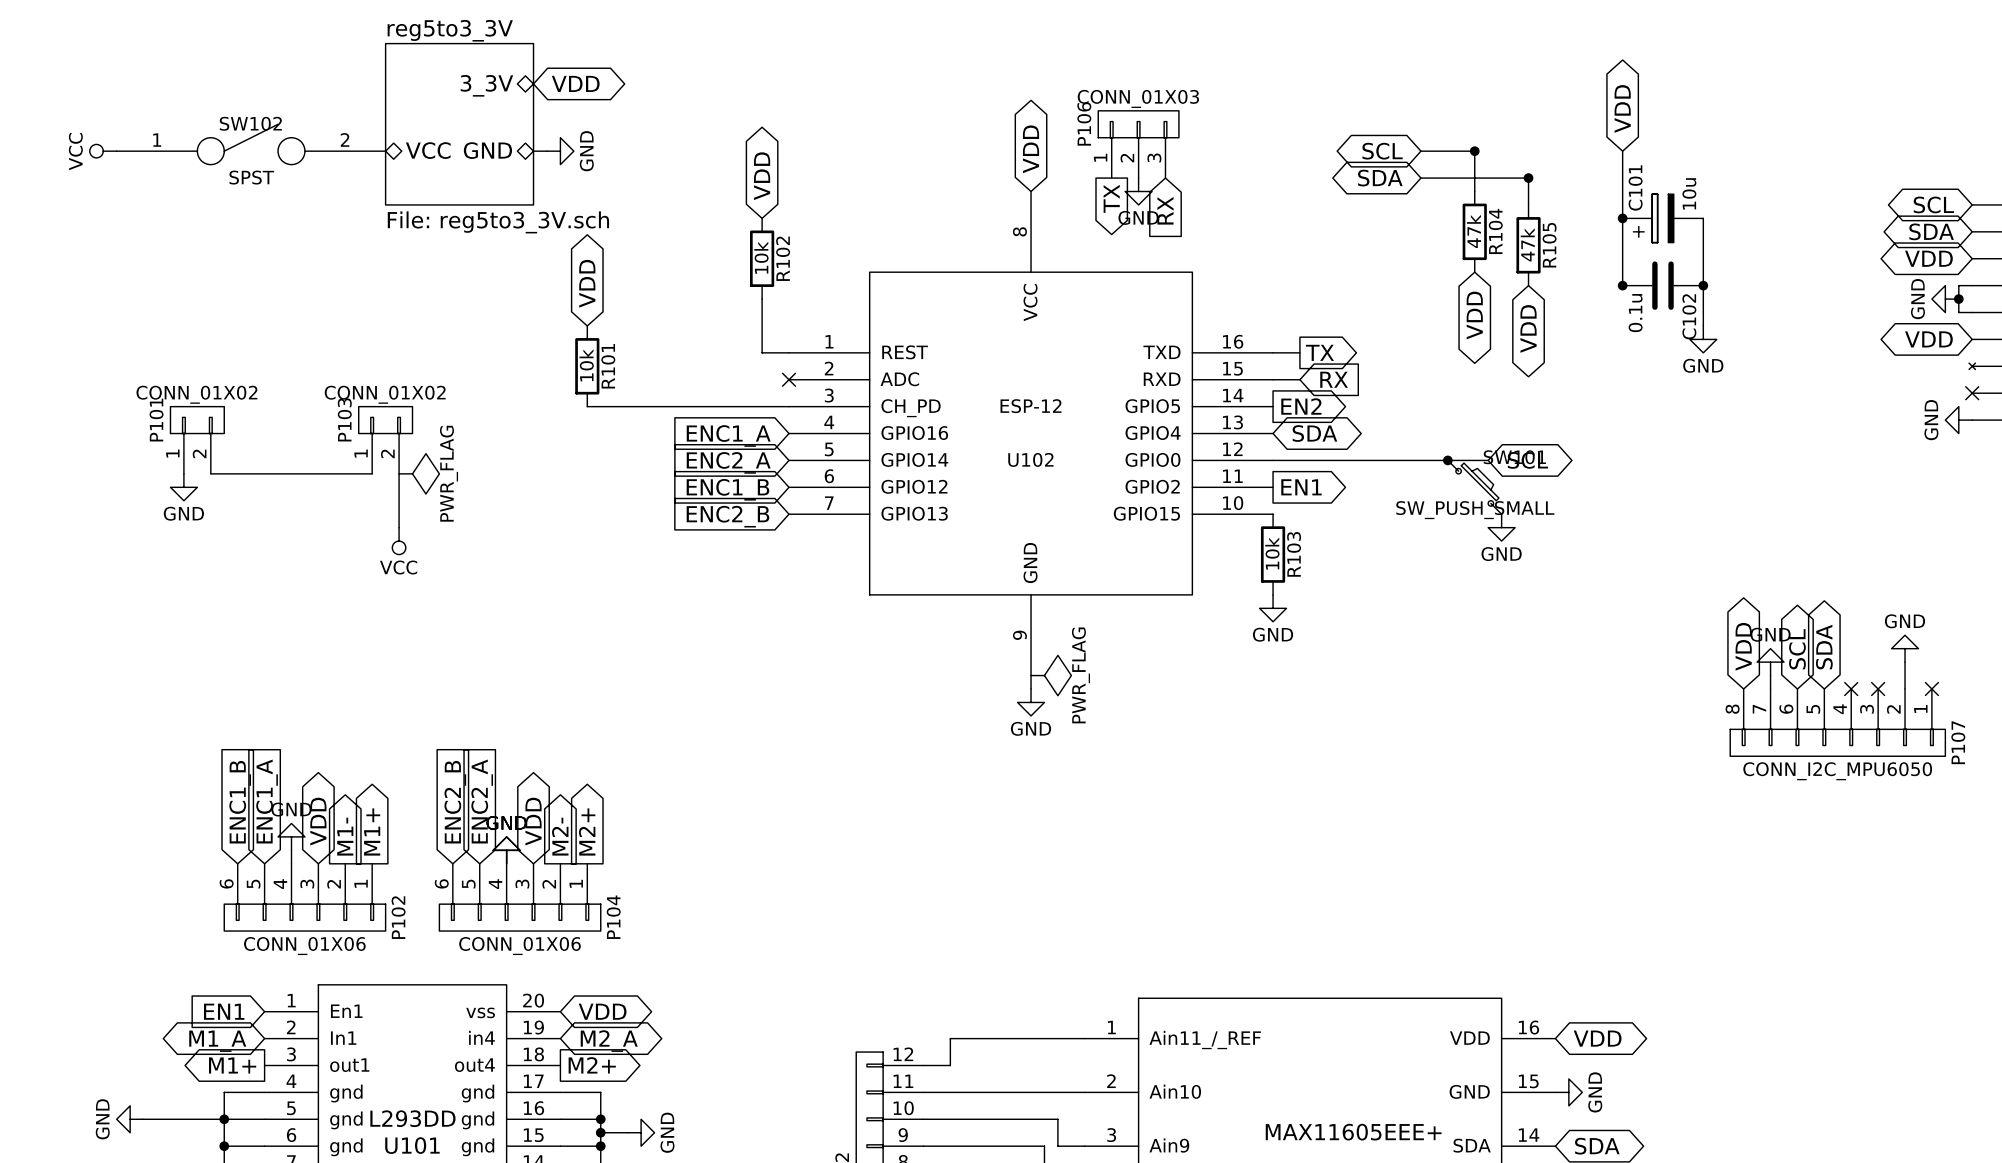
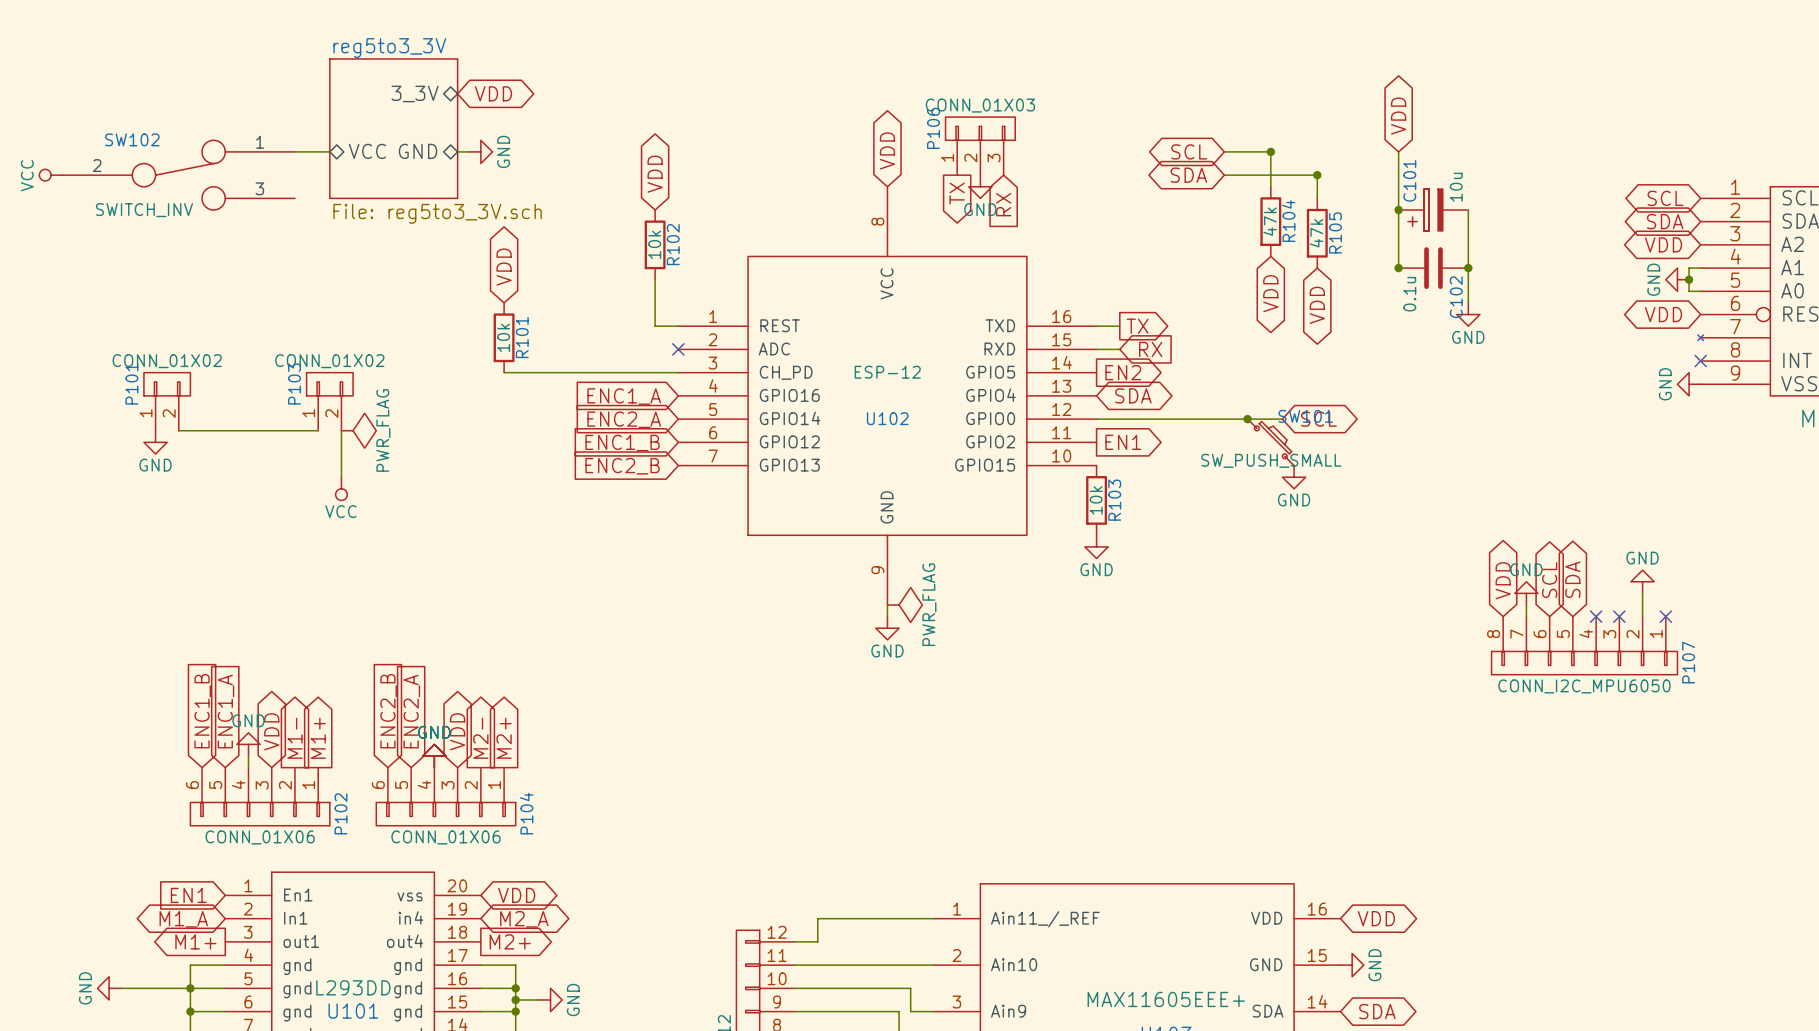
SW102 name position: SW102 (250, 123) -> SW102 (132, 139)
SW102 symbol: [116, 124, 386, 165] -> [62, 140, 295, 211]
power symbol position: VCC (103, 151) -> VCC (51, 175)
SW102 value: SPST (251, 177) -> SWITCH_INV (144, 210)

